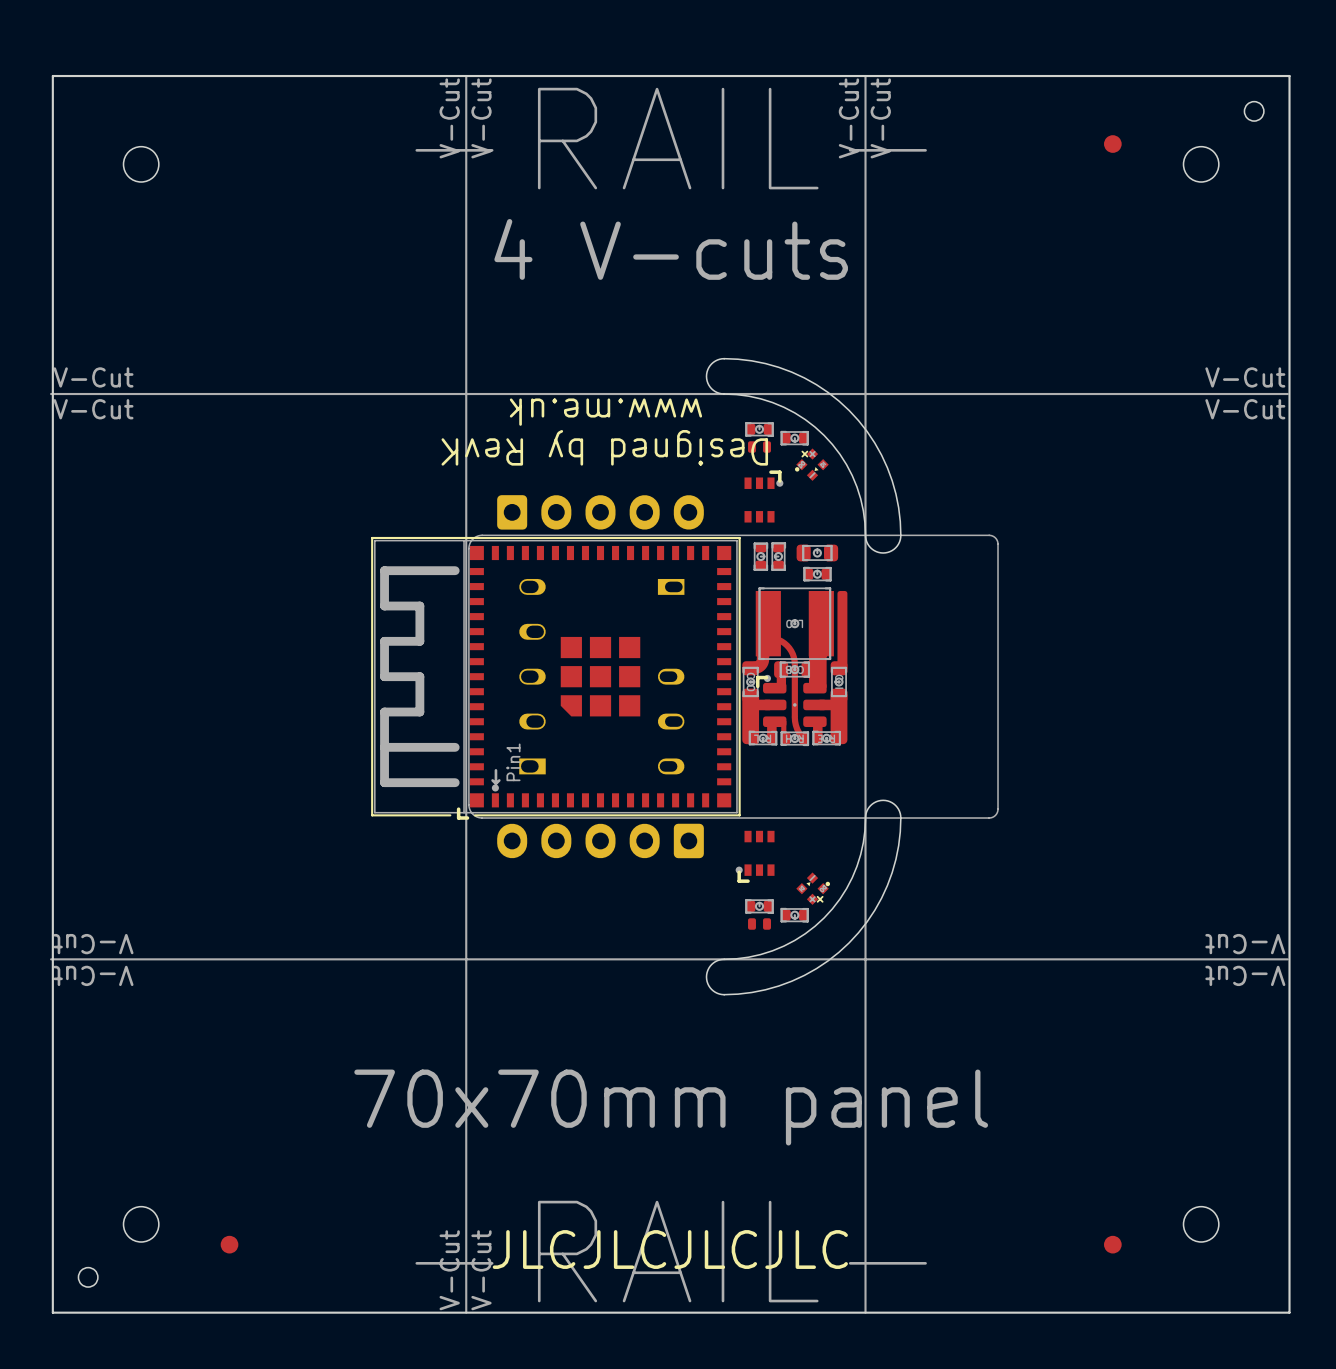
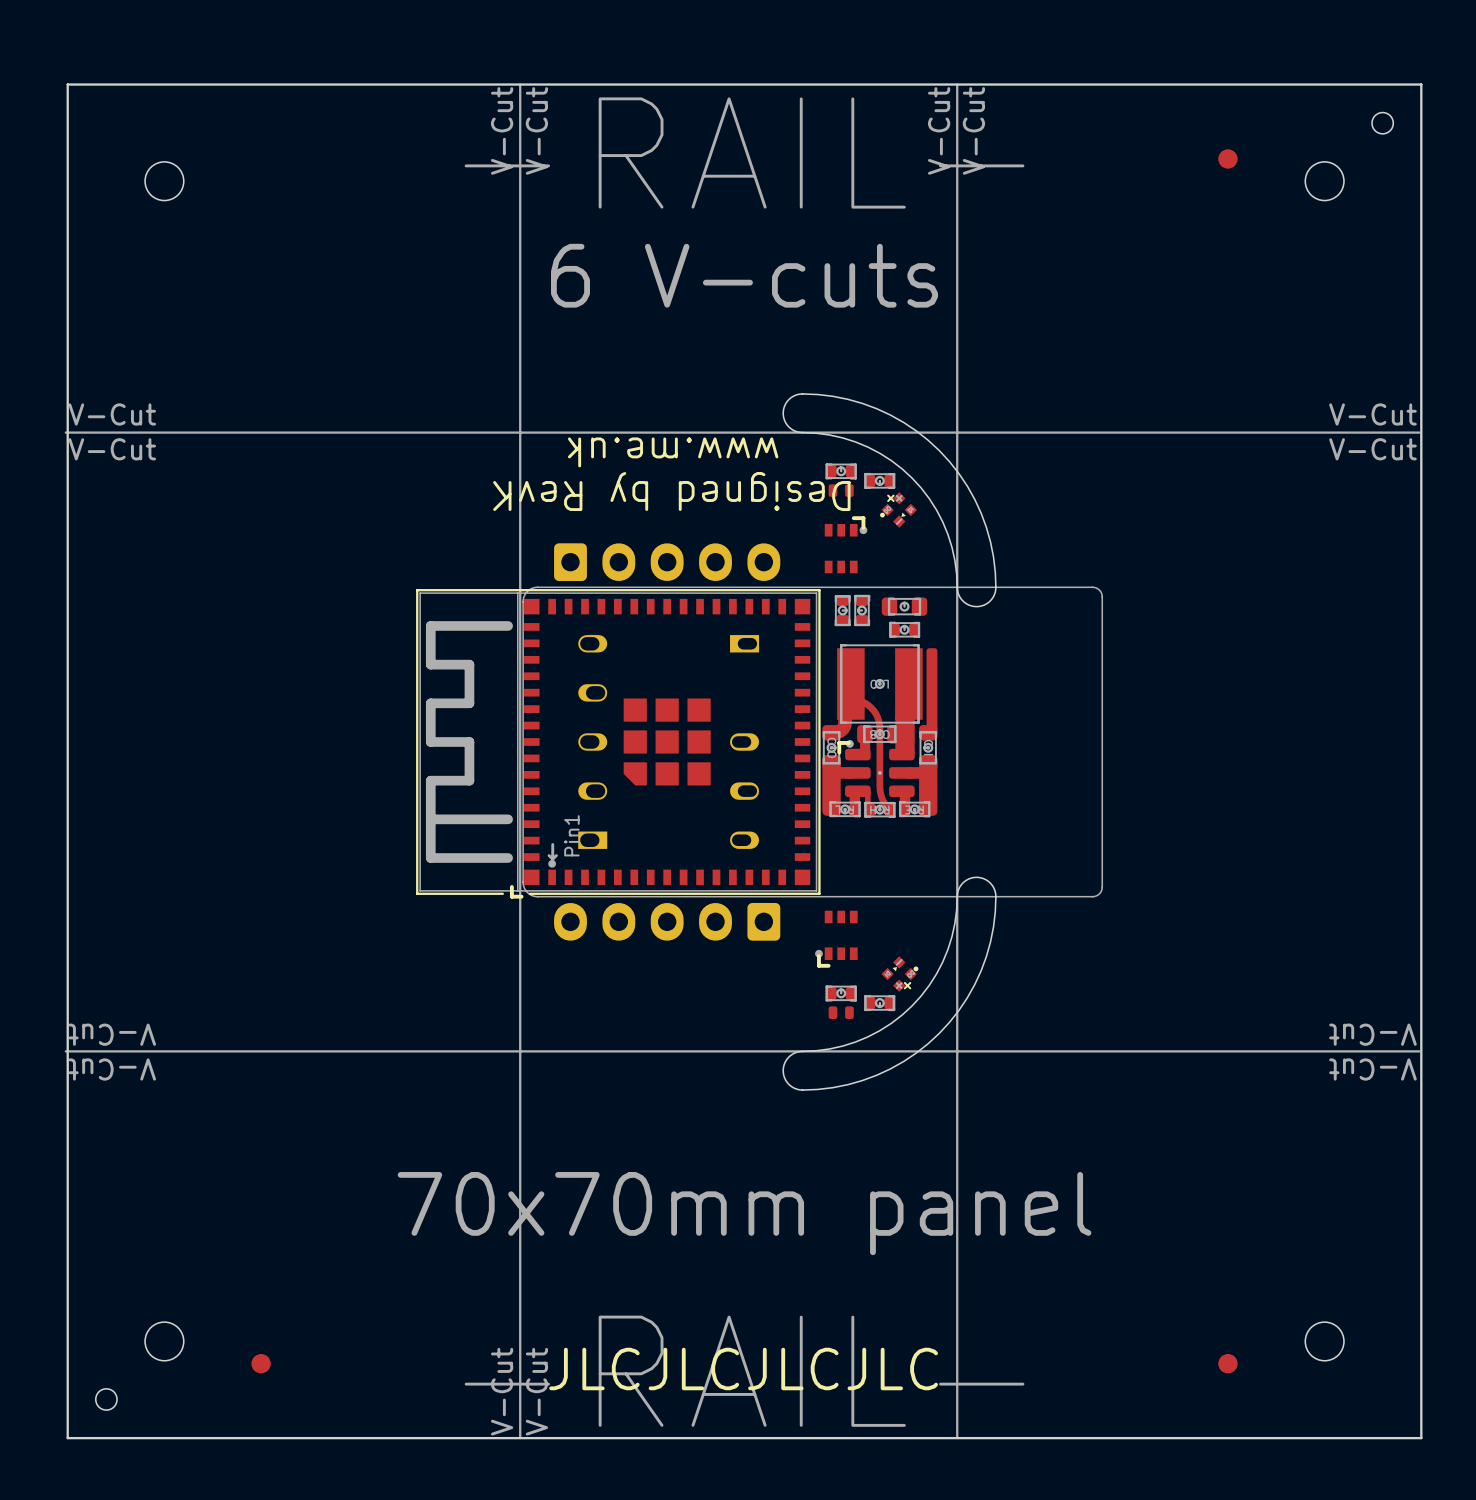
text: 4 V-cuts (671, 249) -> 6 V-cuts (744, 275)

